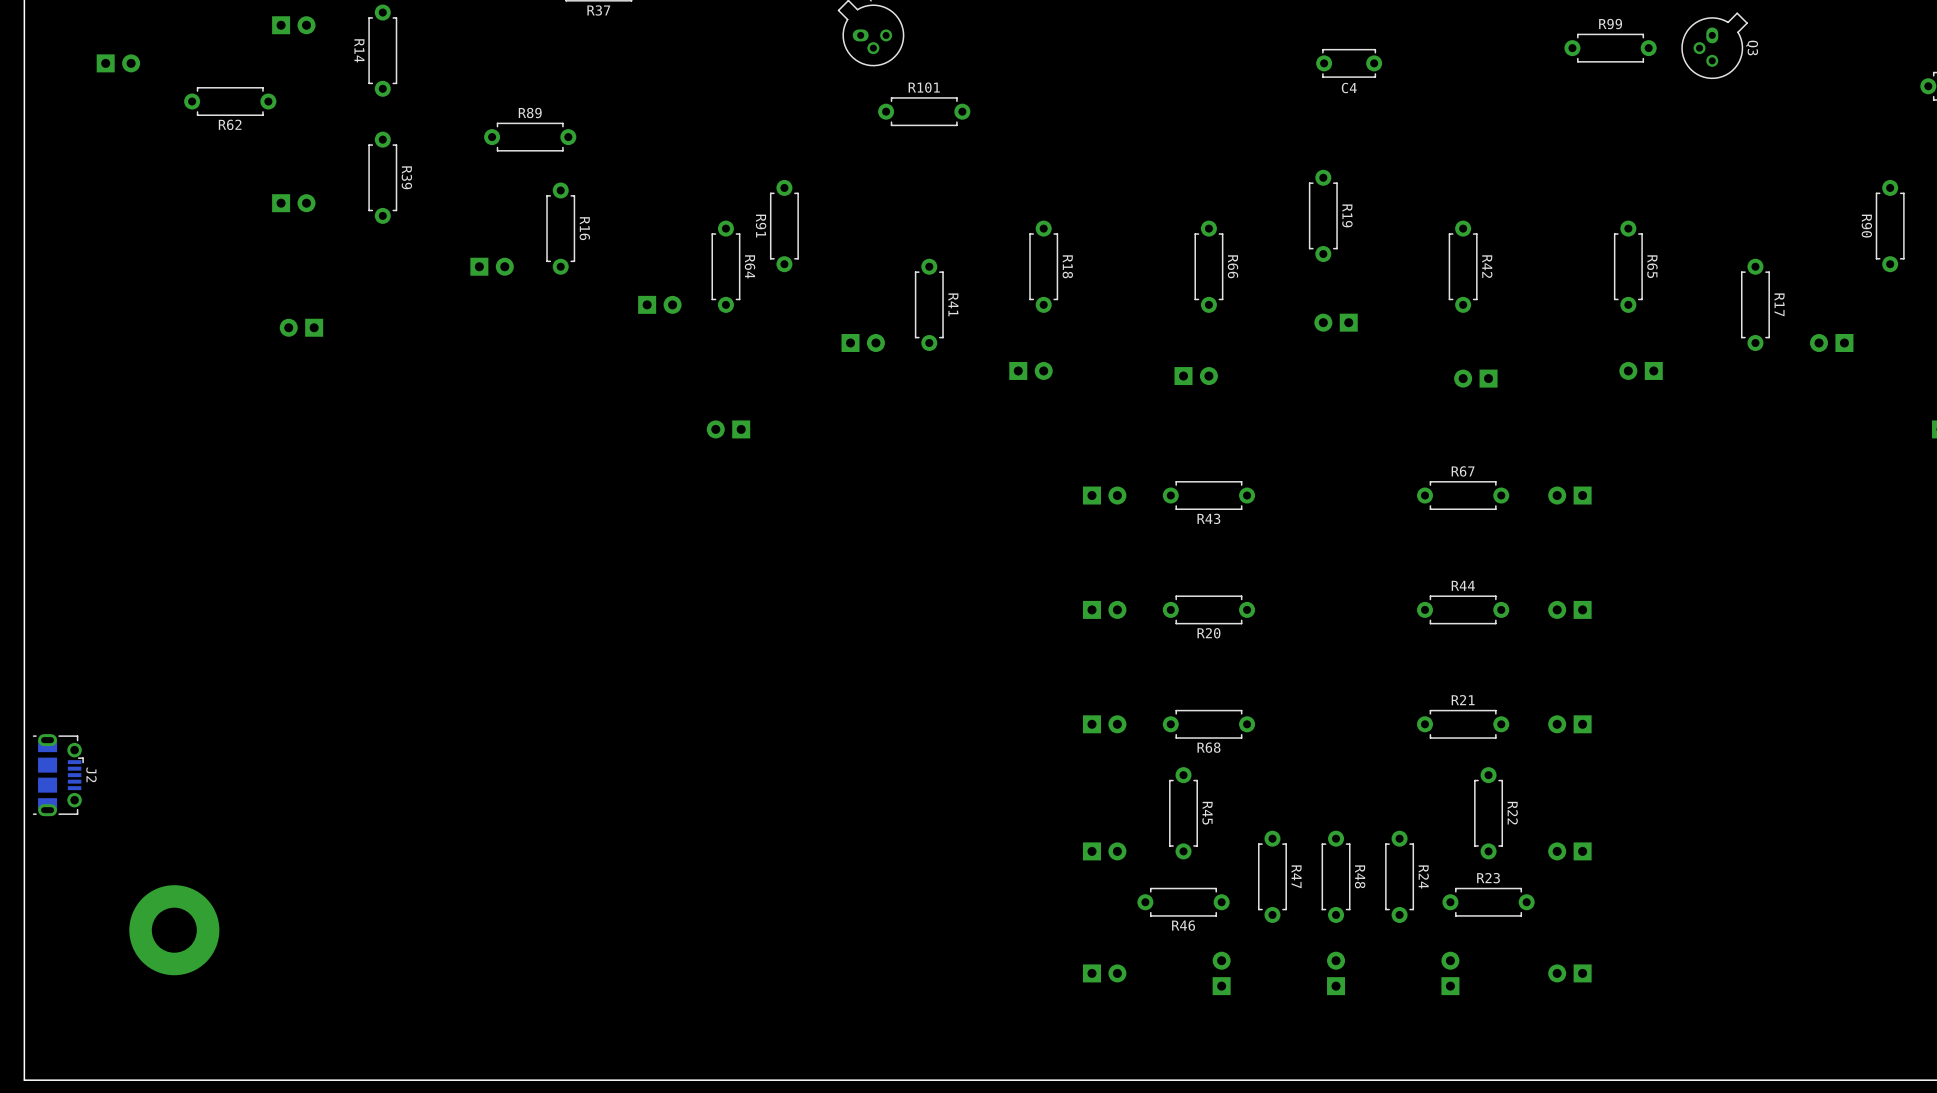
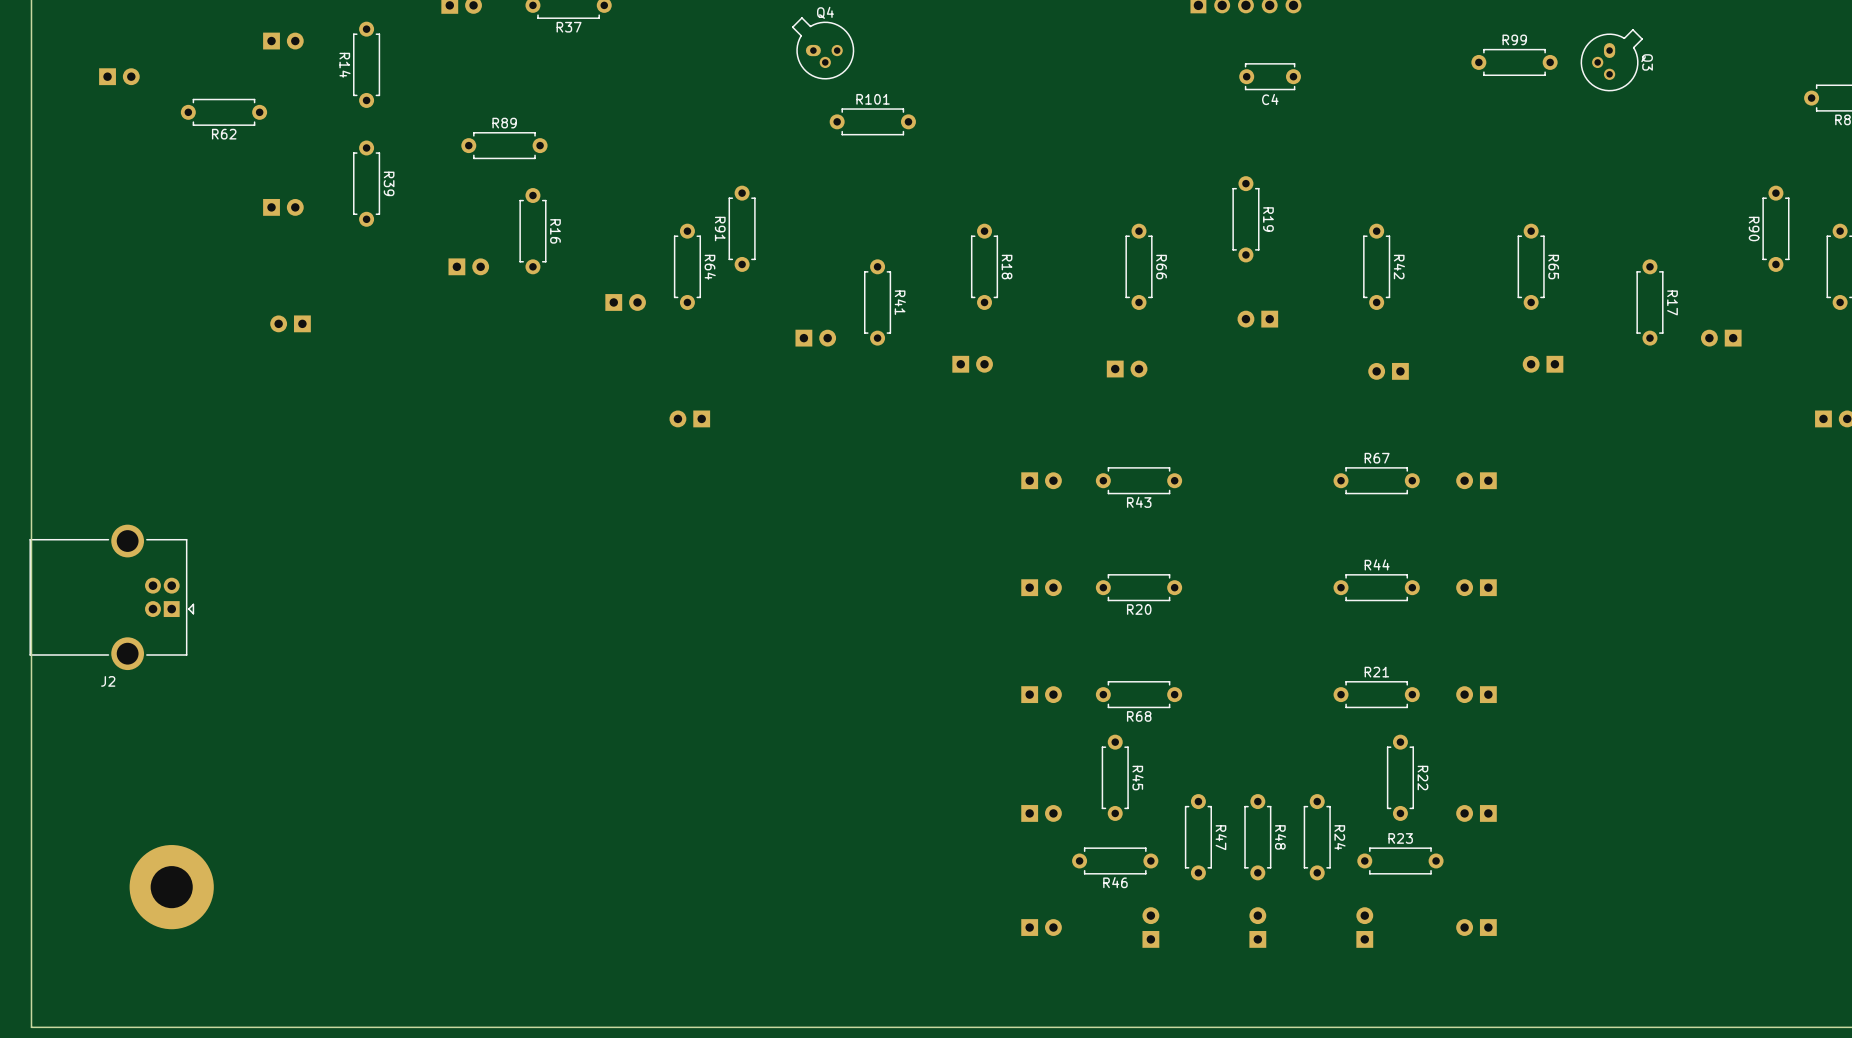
J2 footprint: [32, 734, 84, 817] -> [29, 524, 194, 671]
J2 name position: J2 (91, 774) -> J2 (108, 681)

